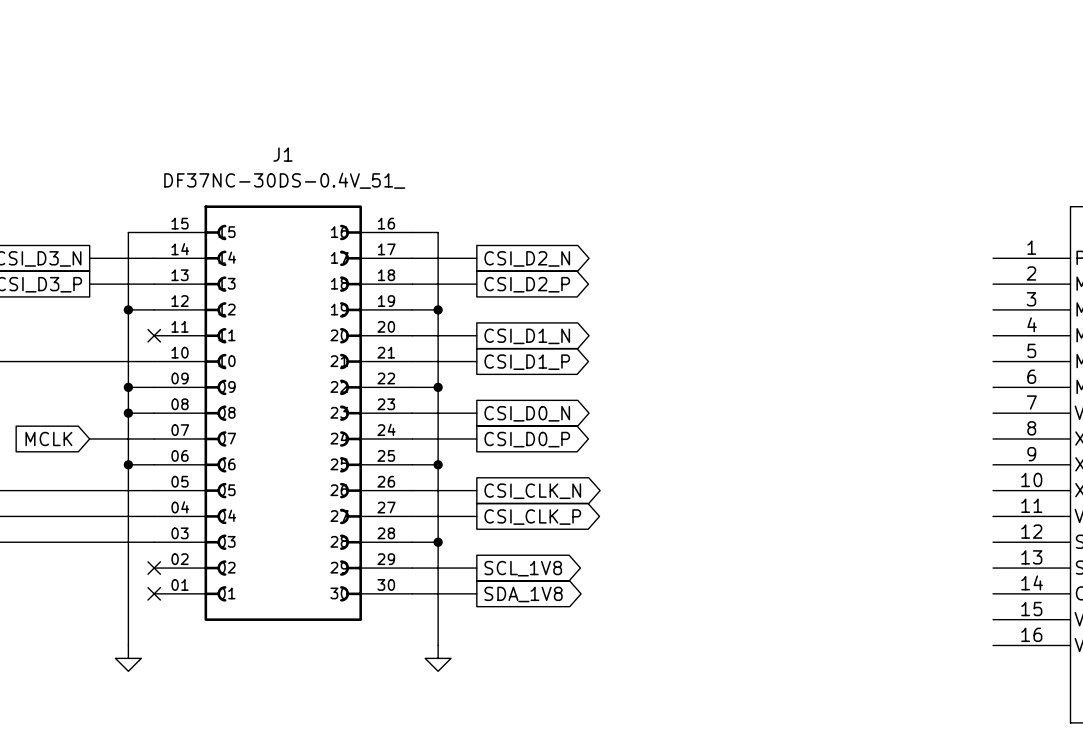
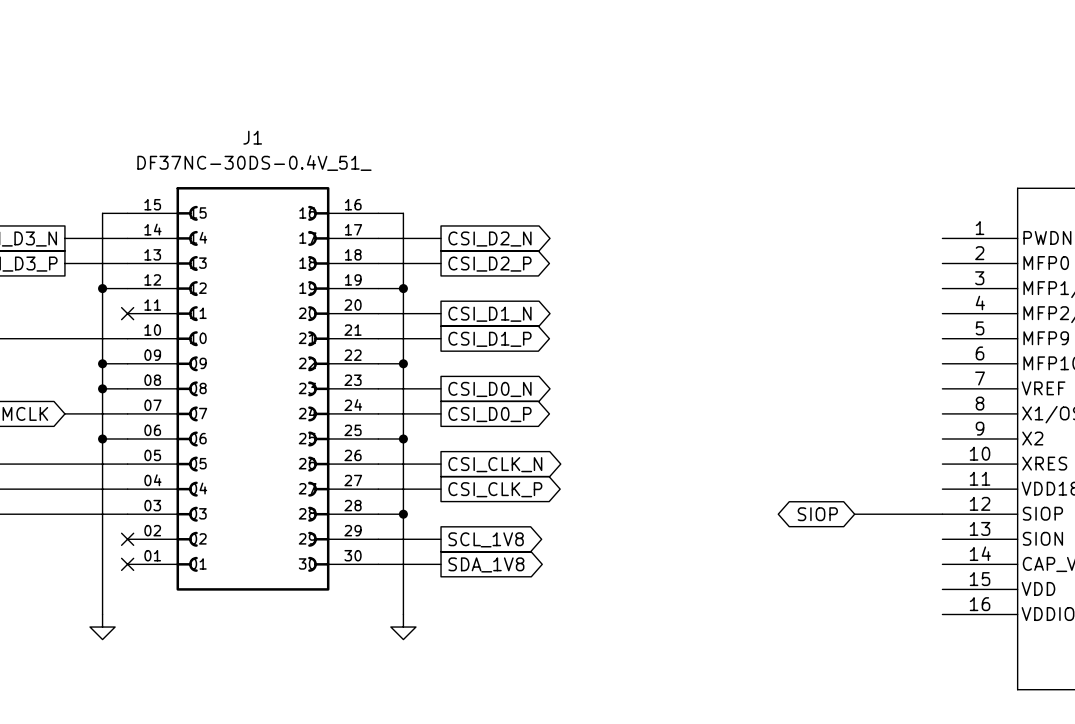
global label: none -> SIOP (817, 514)
wire: none -> (854, 514) (942, 514)

